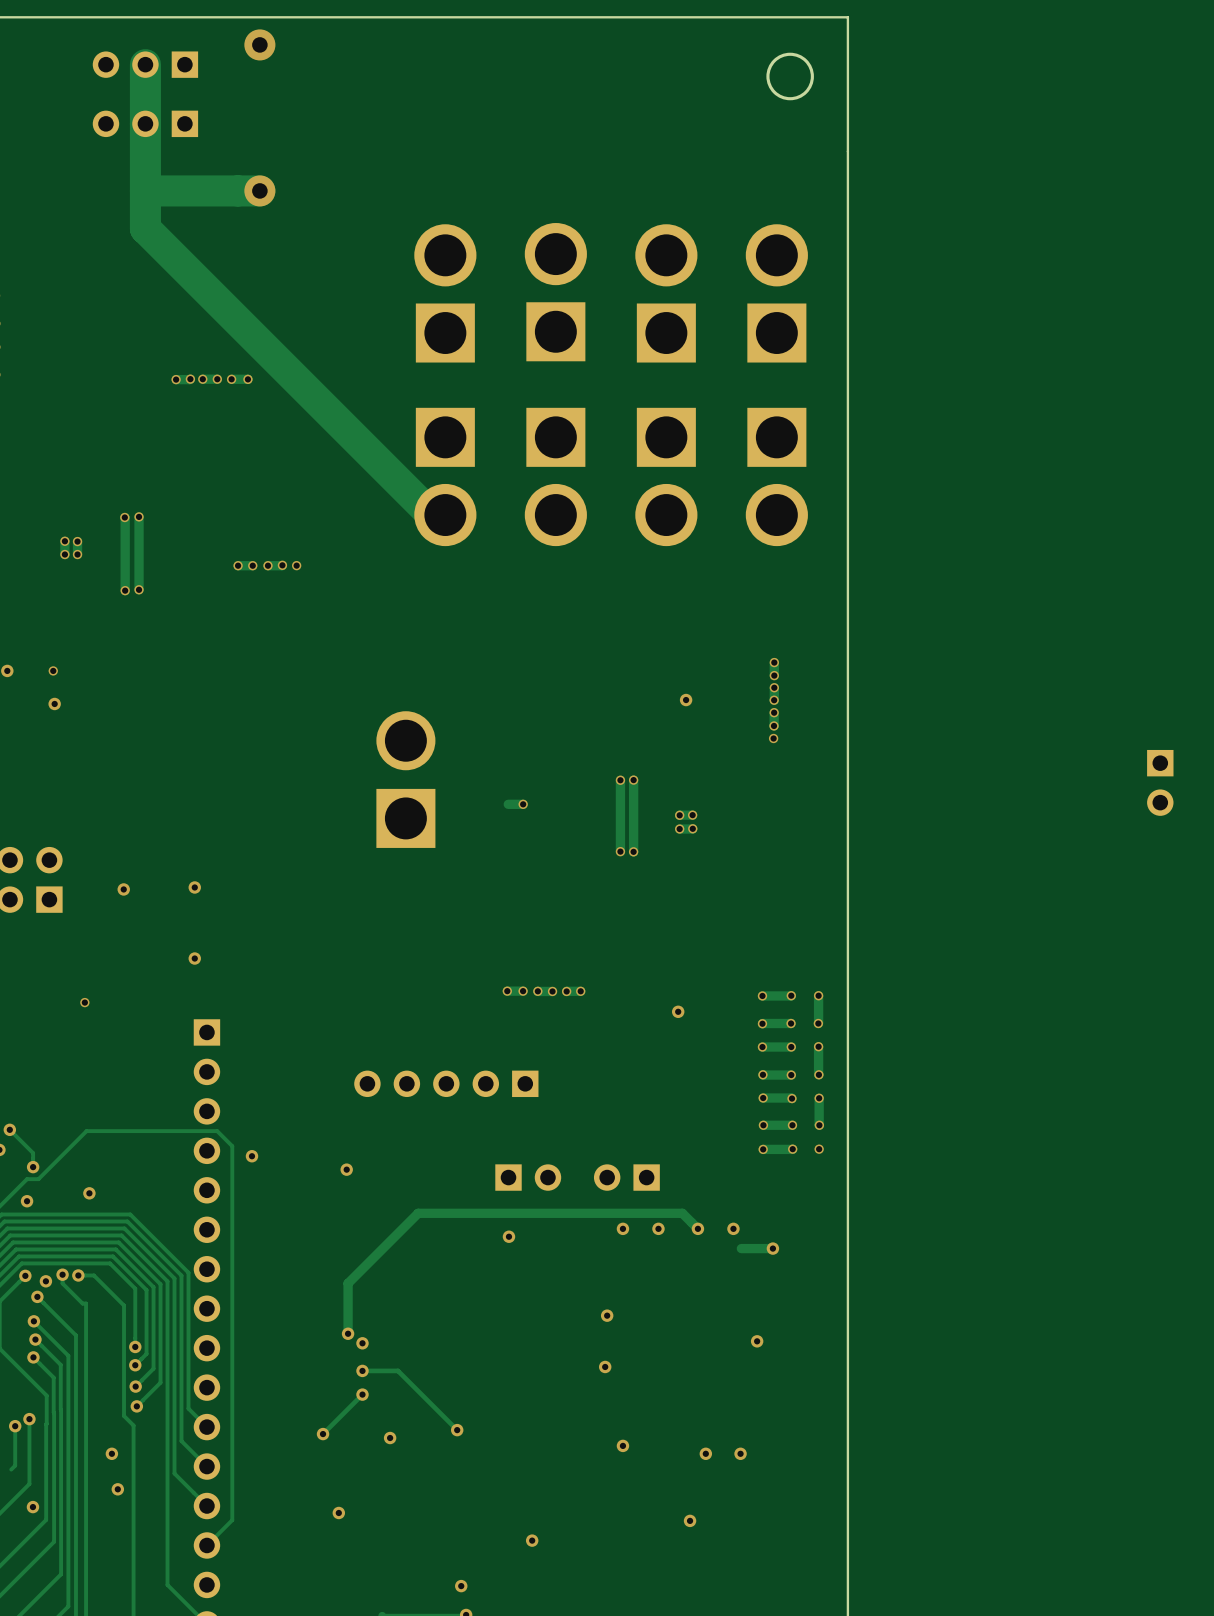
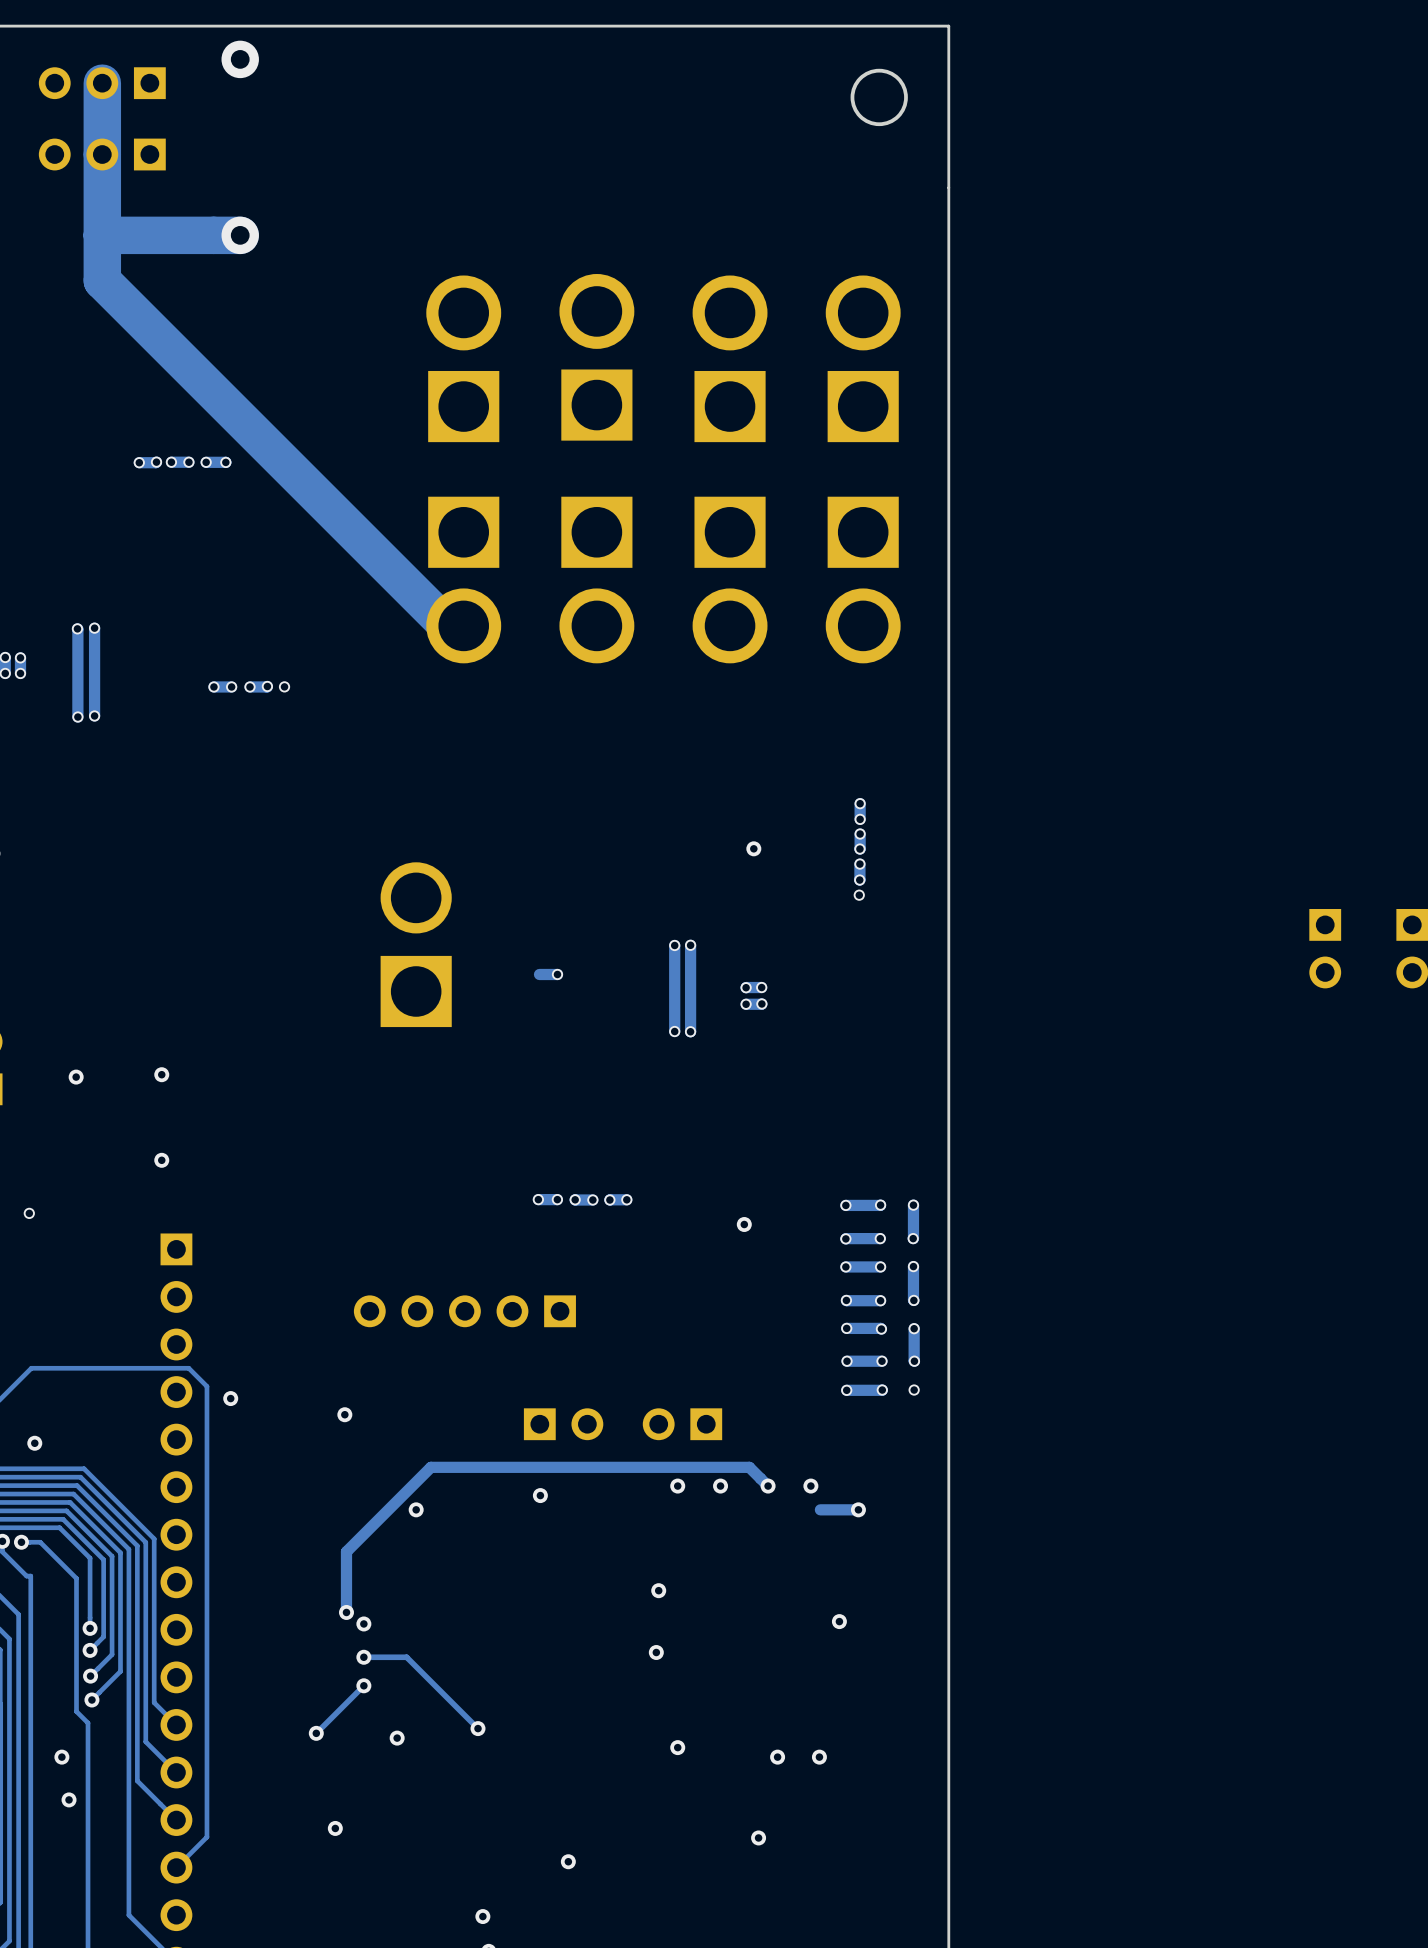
via: none -> (416, 1509)

